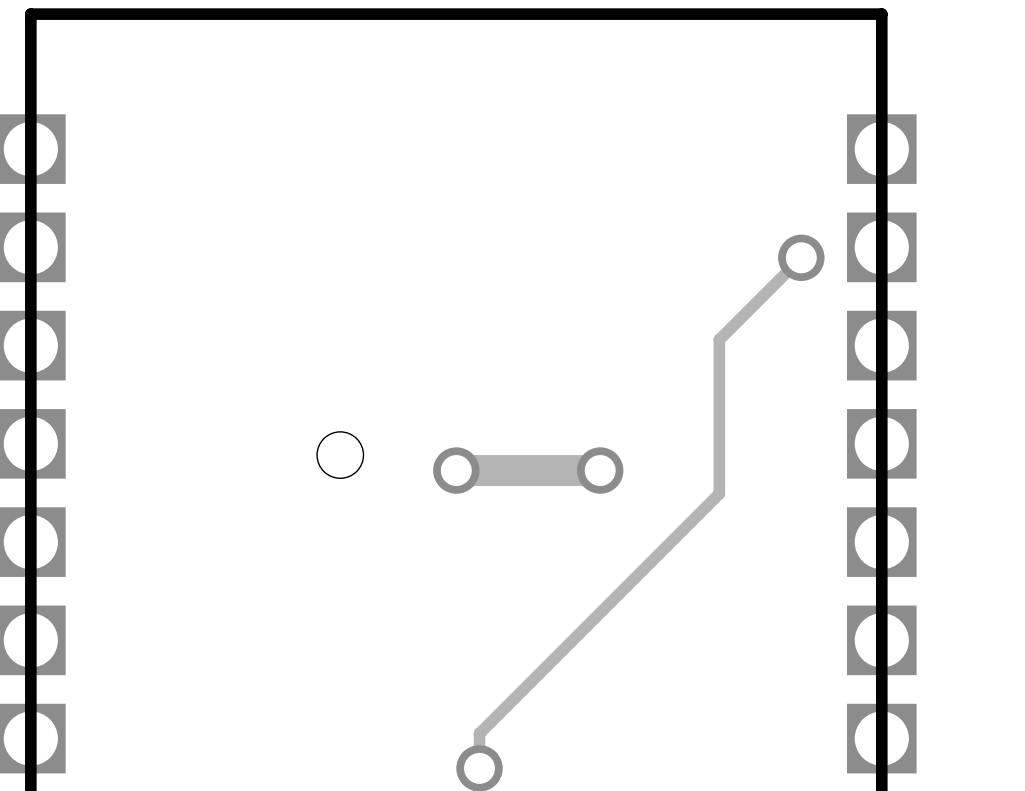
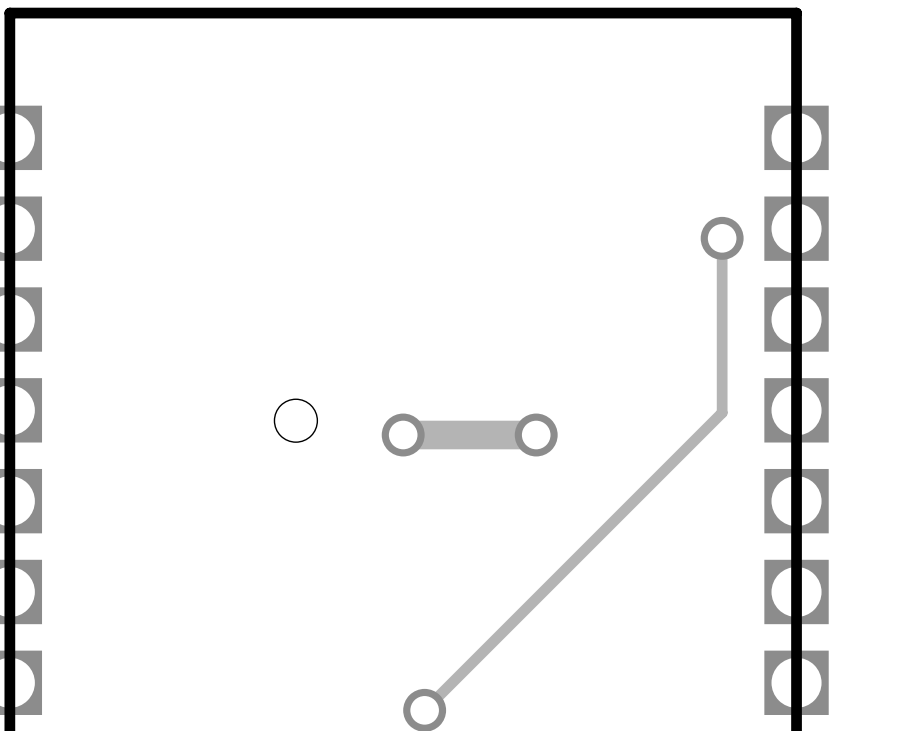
track: (801, 257) (719, 339) (719, 493) (479, 733) (479, 768) -> (722, 238) (722, 412) (424, 710)

